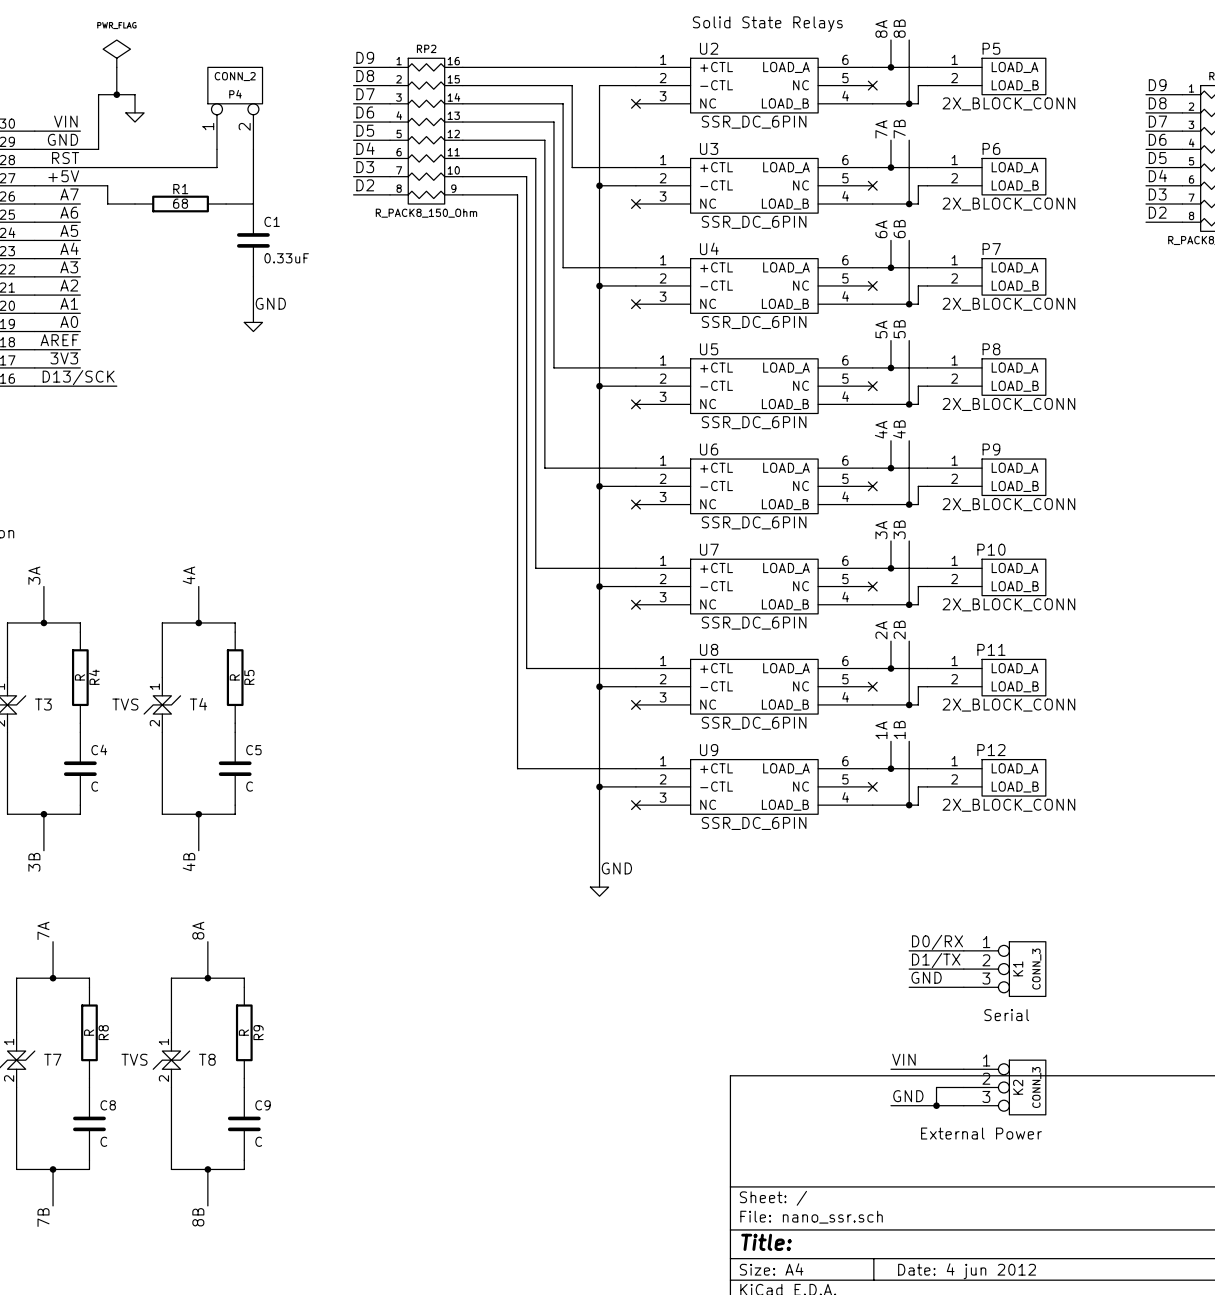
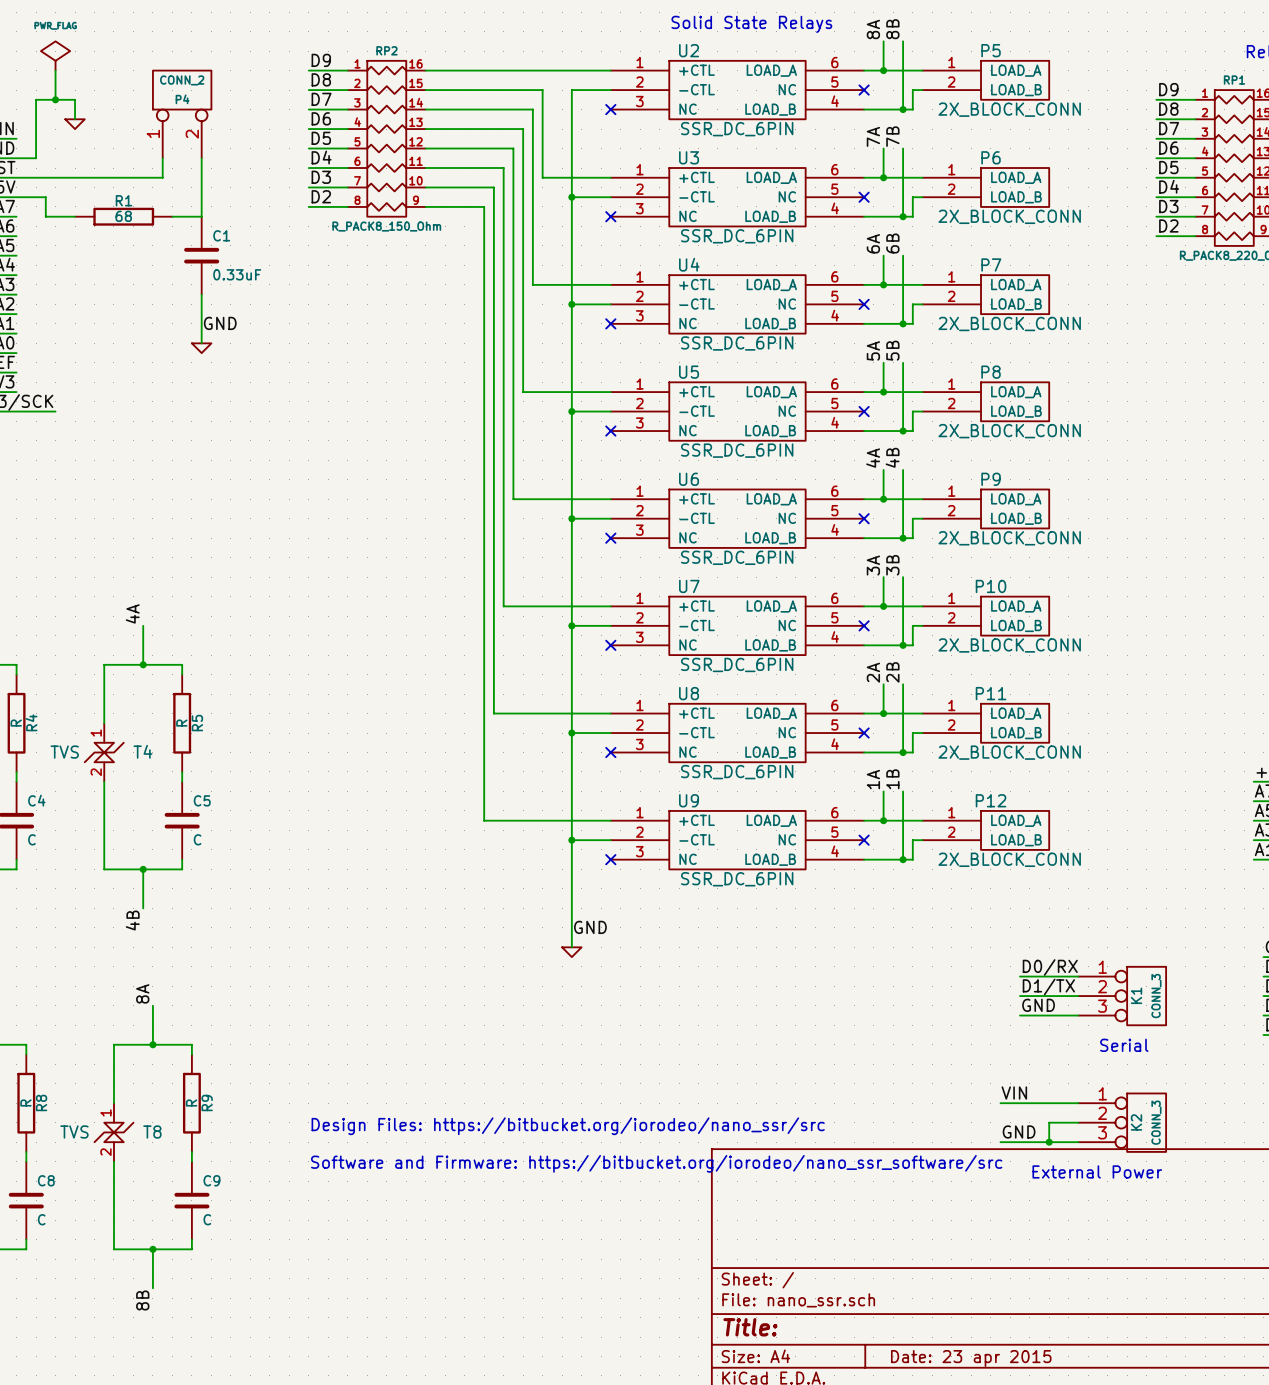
label: none -> GND (1038, 1005)
label position: D0/RX (937, 942) -> D0/RX (1050, 967)
wire: (909, 950) (963, 950) -> (1019, 976) (1078, 976)
label position: D1/TX (936, 960) -> D1/TX (1048, 986)
wire: (909, 969) (963, 969) -> (1019, 996) (1078, 996)
K1 position: (1004, 969) -> (1122, 996)
label: GND (926, 977) -> none
wire: (909, 987) (963, 987) -> (1019, 1015) (1078, 1015)
text position: Serial (1006, 1015) -> Serial (1124, 1045)
text: none -> Design Files: https://bitbucket.org/iorodeo/nano_ssr/src (568, 1126)
label position: VIN (903, 1059) -> VIN (1014, 1093)
label: none -> GND (1019, 1131)
wire: (890, 1069) (963, 1069) -> (1000, 1103) (1078, 1103)
junction: none -> (1049, 1142)
wire: (963, 1087) (936, 1087) (936, 1105) -> (1078, 1122) (1049, 1122) (1049, 1142)
K2 position: (1004, 1087) -> (1122, 1122)
text: none -> Software and Firmware: https://bitbucket.org/iorodeo/nano_ssr_software/src (656, 1163)
label: GND (908, 1096) -> none
wire: (890, 1105) (963, 1105) -> (1000, 1142) (1078, 1142)
junction: (936, 1105) -> none
text position: External Power (981, 1133) -> External Power (1097, 1171)
title block: Date: 4 jun 2012 (967, 1271) -> Date: 23 apr 2015 (971, 1358)

